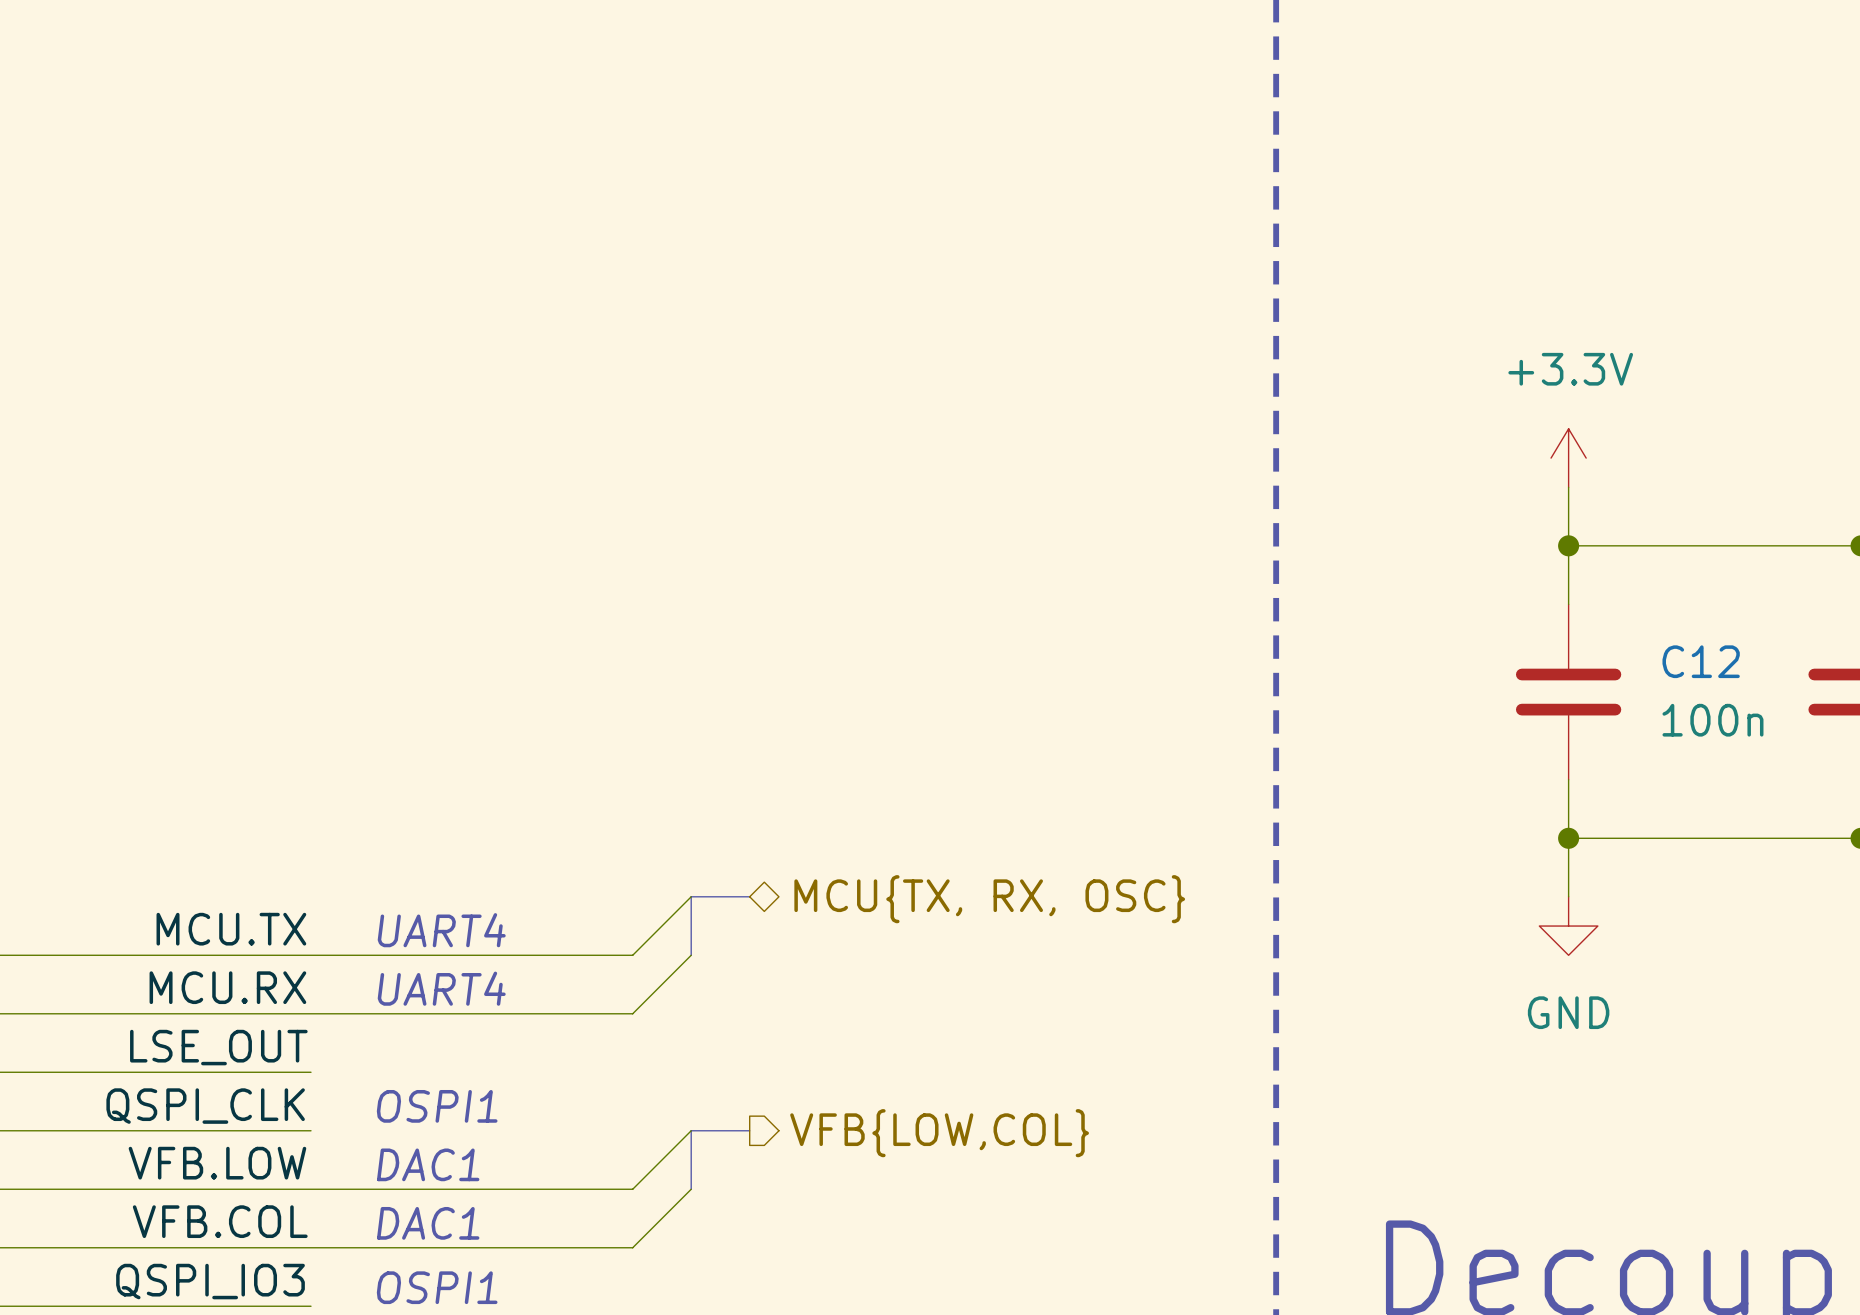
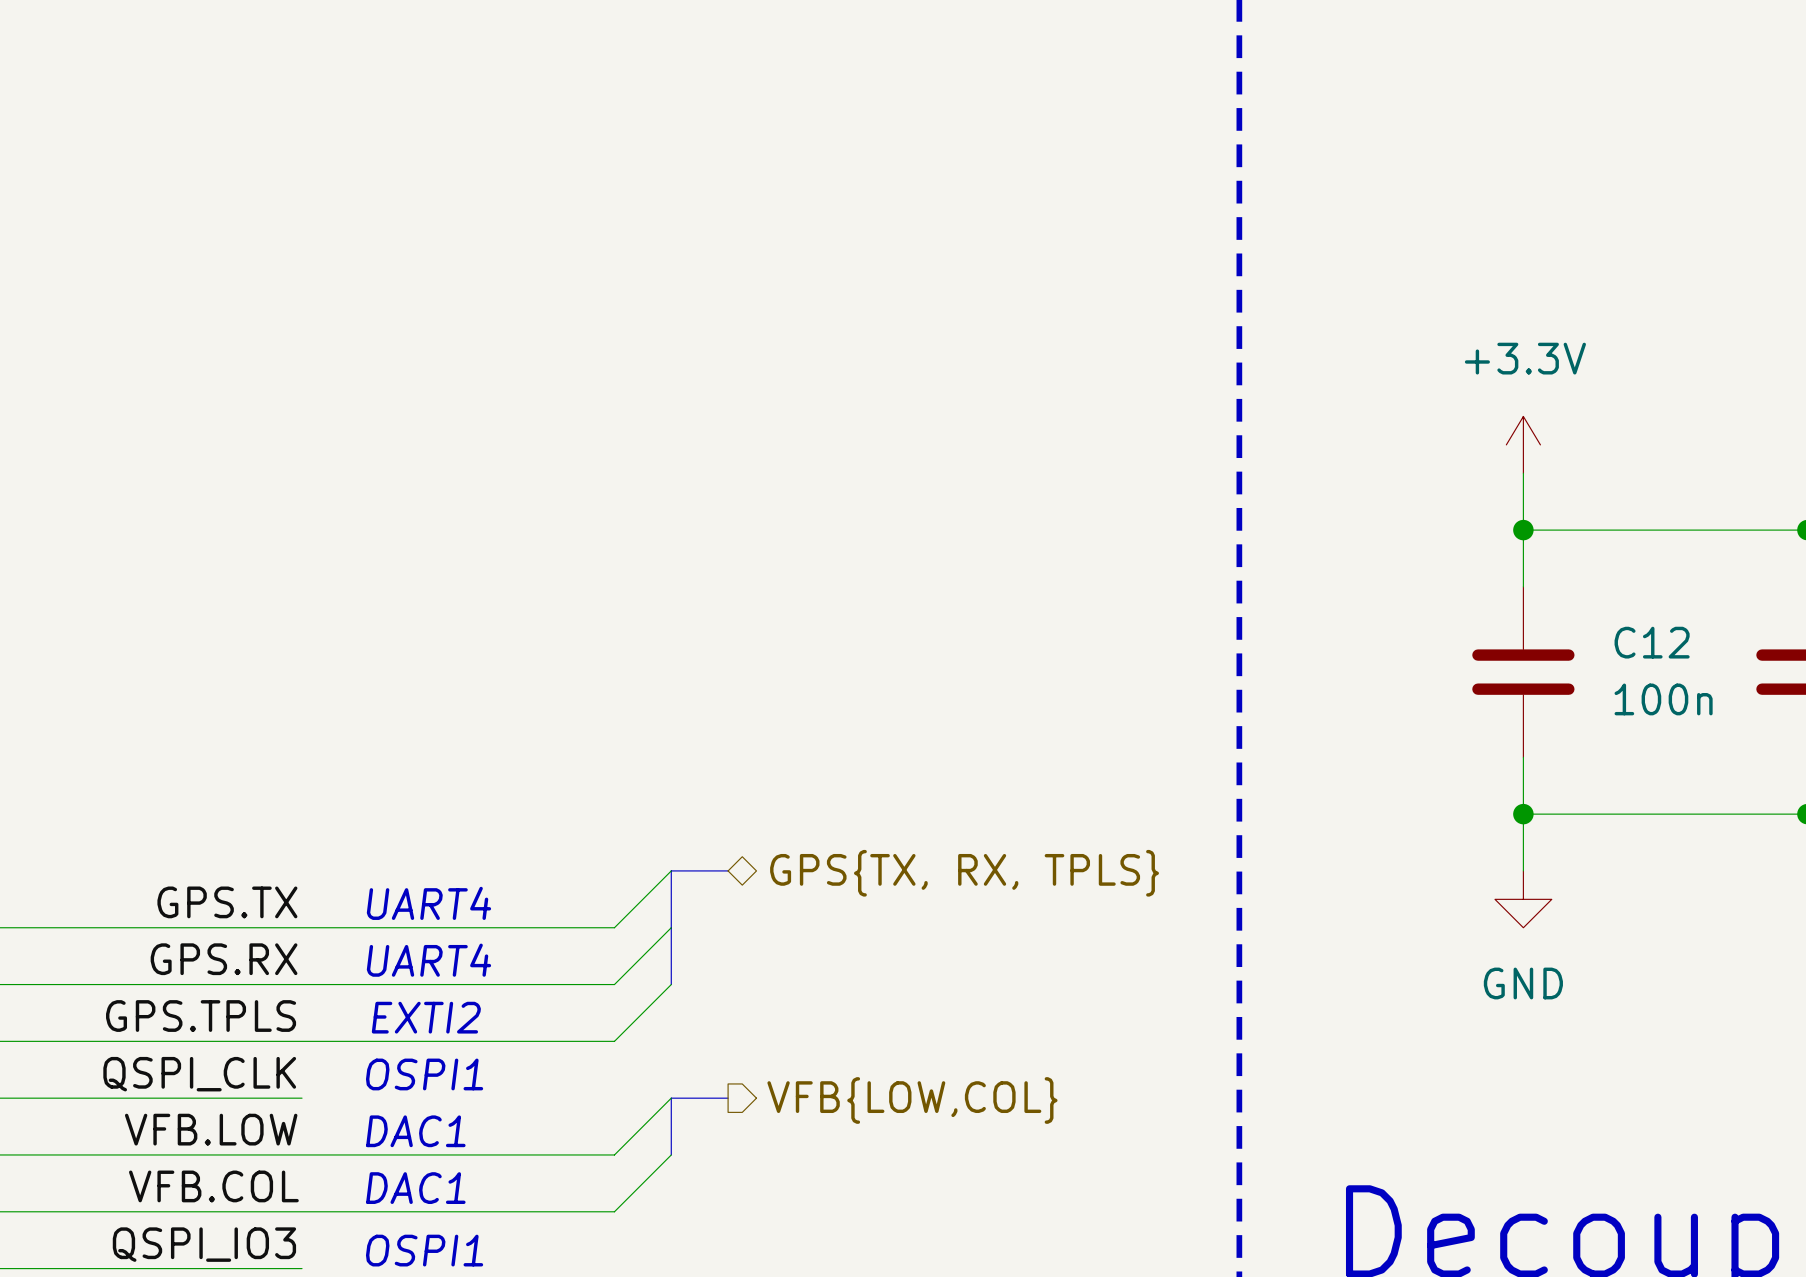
hierarchical label: MCU{TX, RX, OSC} (989, 899) -> GPS{TX, RX, TPLS} (964, 873)
label: MCU.TX (231, 929) -> GPS.TX (227, 902)
bus: none -> (671, 927) (671, 984)
label: MCU.RX (227, 987) -> GPS.RX (224, 959)
wire: none -> (671, 984) (614, 1041) (302, 1041)
label: LSE_OUT (218, 1047) -> GPS.TPLS (201, 1016)
text: none -> EXTI2 (426, 1017)

